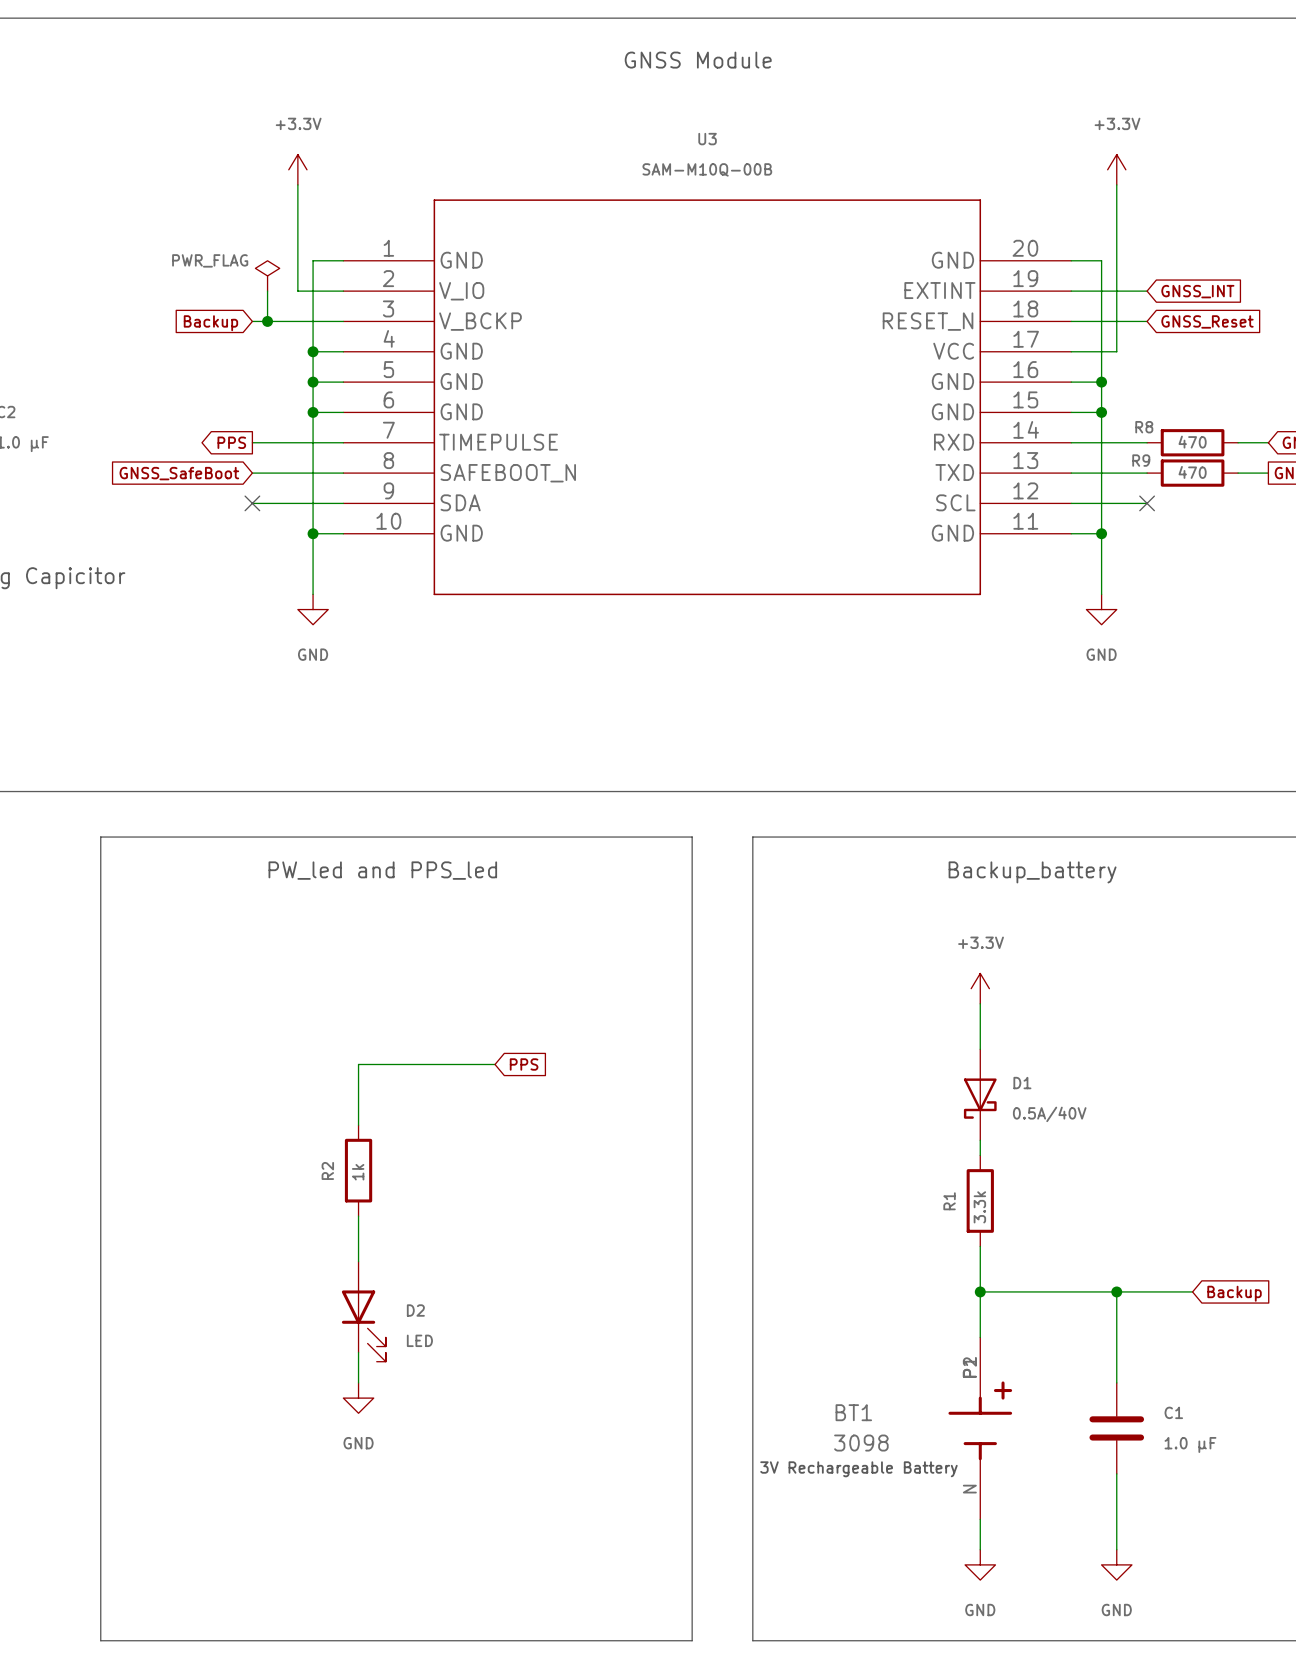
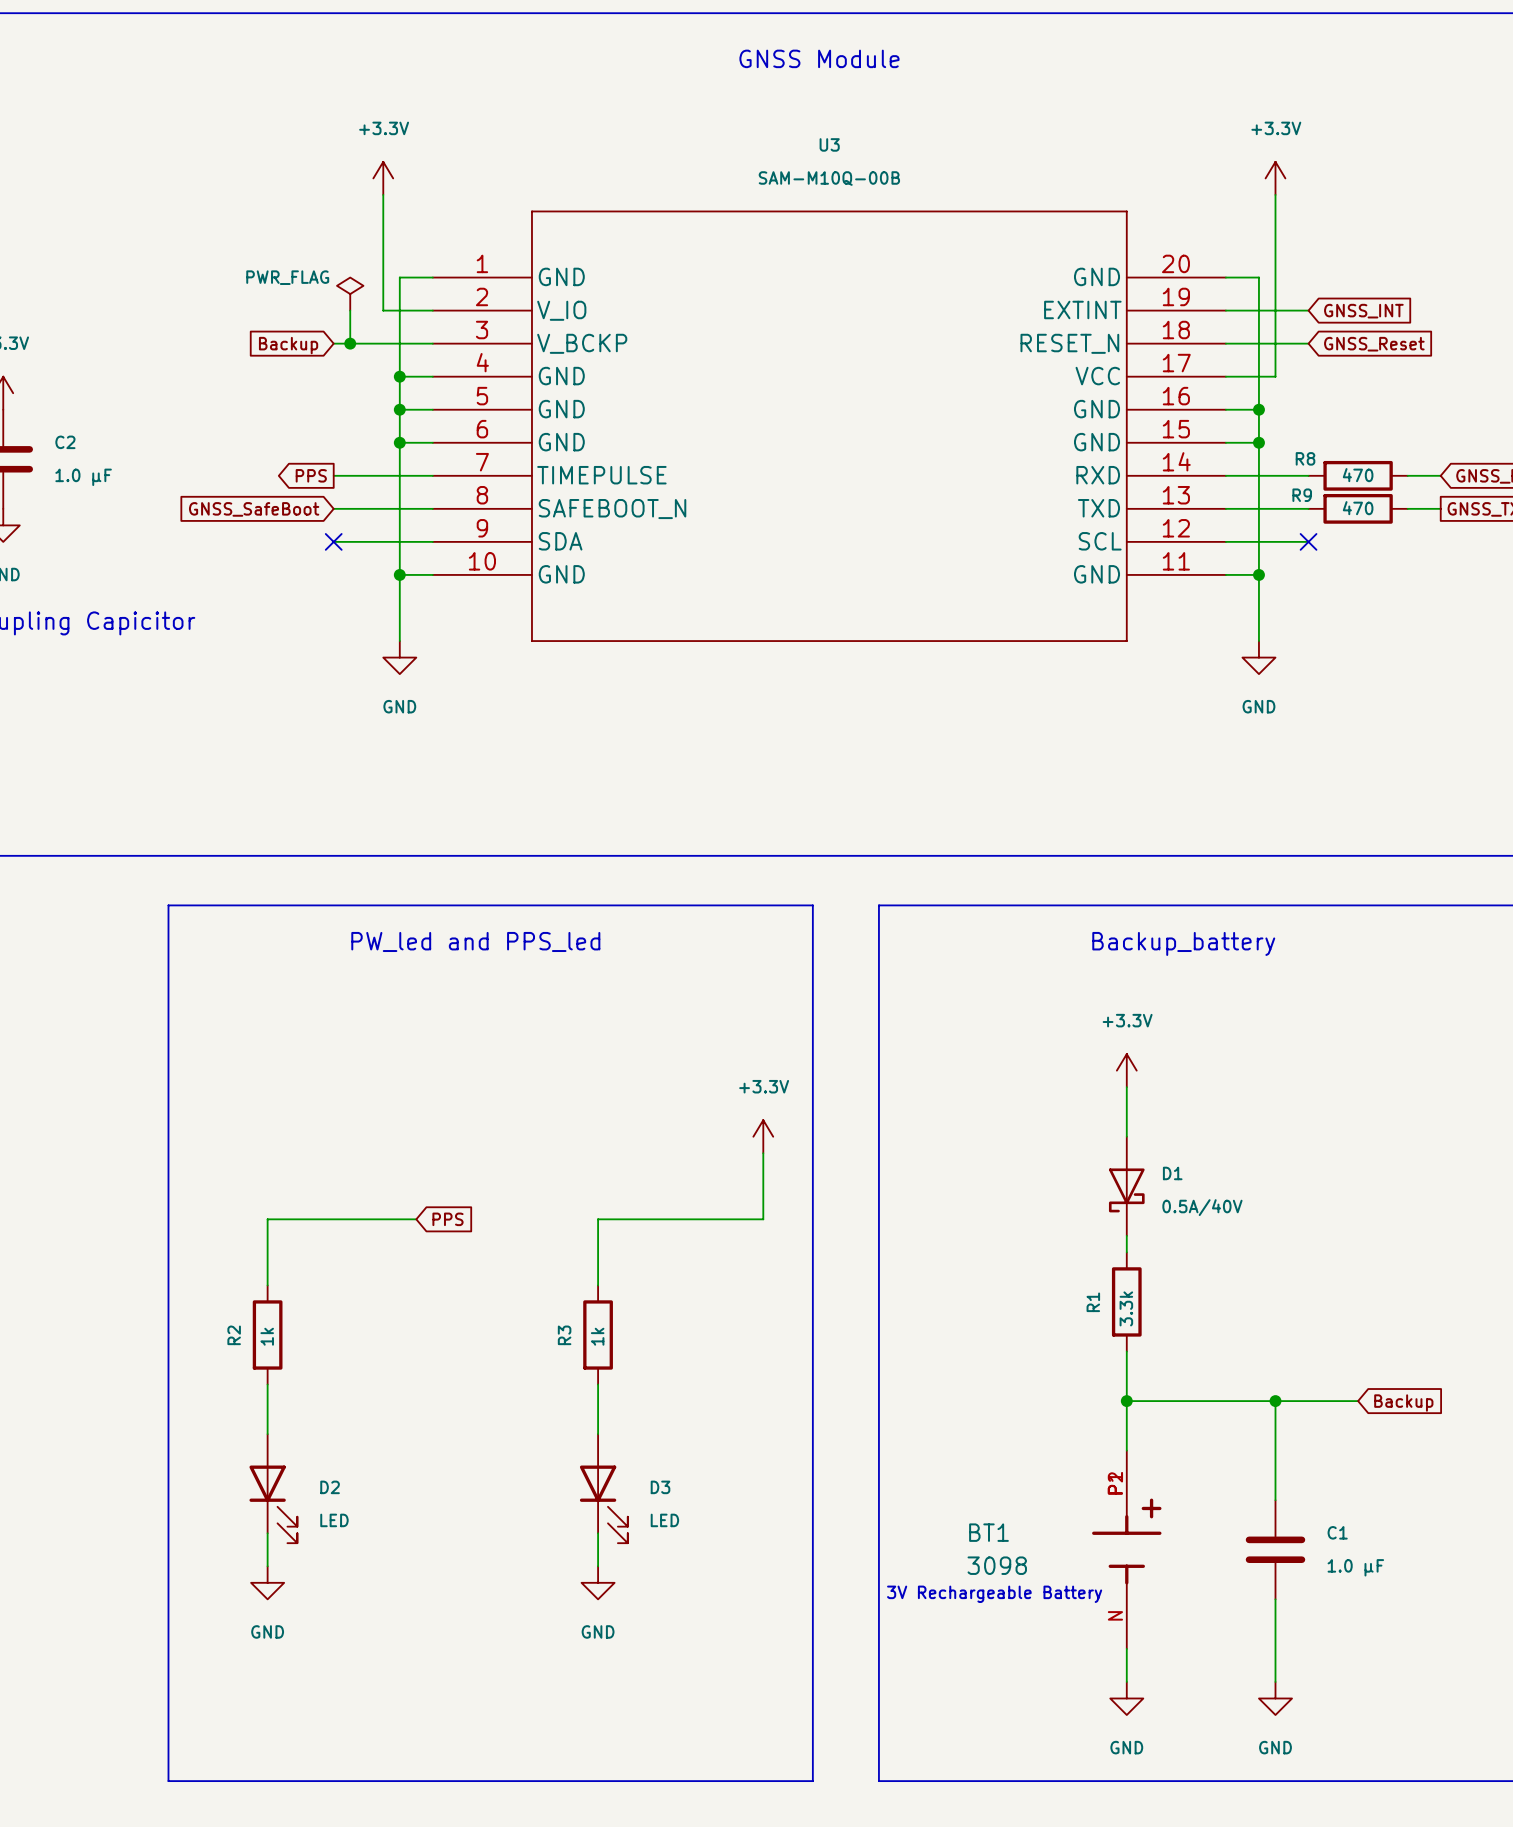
power symbol: none -> +3.3V (763, 1136)
wire: (495, 1064) (358, 1064) (358, 1125) -> (416, 1219) (267, 1219) (267, 1285)
global label position: PPS (524, 1064) -> PPS (447, 1219)
wire: none -> (763, 1153) (763, 1219) (598, 1219) (598, 1285)
R2 position: (358, 1170) -> (267, 1334)
wire: (358, 1216) (358, 1261) -> (267, 1384) (267, 1434)
R3: none -> 1k (598, 1334)
wire: none -> (598, 1384) (598, 1434)
D2 position: (363, 1311) -> (273, 1488)
wire: (358, 1352) (358, 1382) -> (267, 1533) (267, 1566)
D3: none -> LED (603, 1488)
power symbol: GND (358, 1398) -> none
wire: none -> (598, 1533) (598, 1566)
power symbol: none -> GND (267, 1582)
power symbol: none -> GND (598, 1582)

